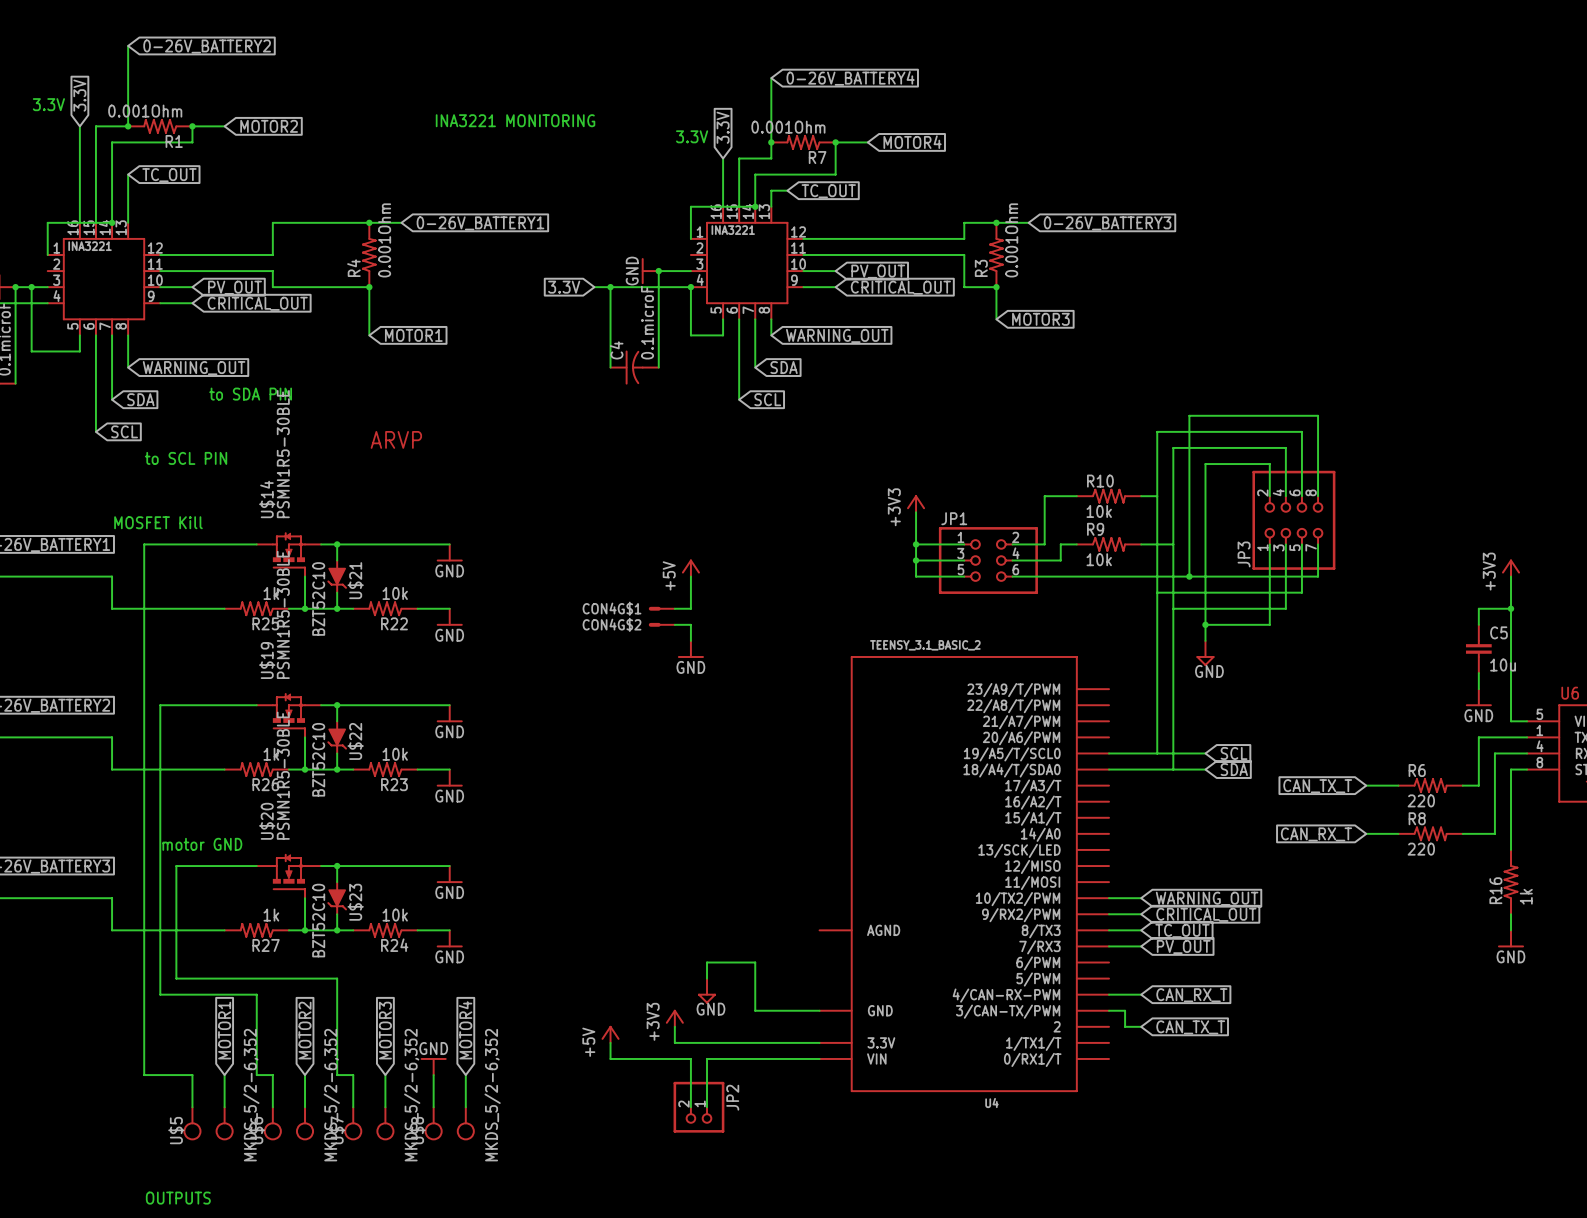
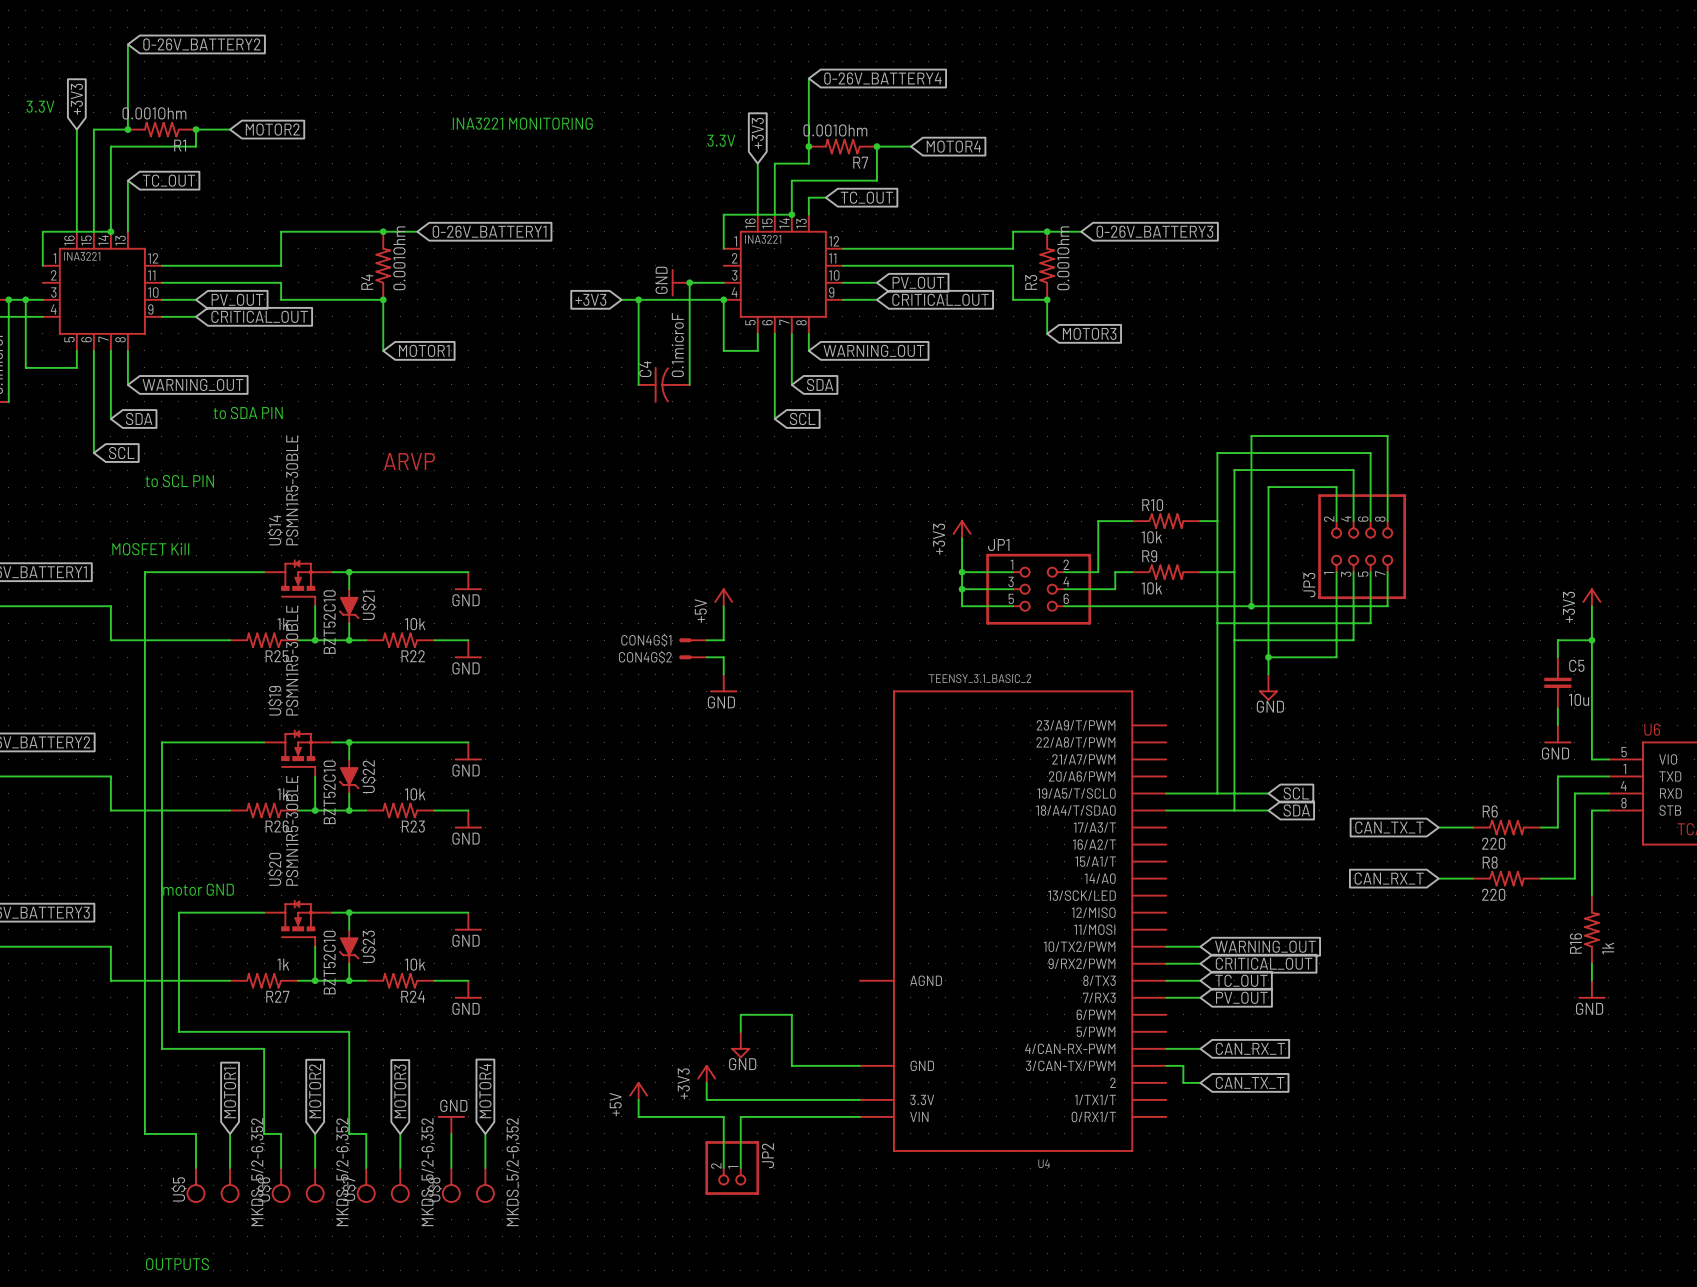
global label: 3.3V (79, 95) -> +3V3 (76, 99)
global label: 3.3V (723, 127) -> +3V3 (757, 133)
global label: 3.3V (564, 287) -> +3V3 (590, 299)

